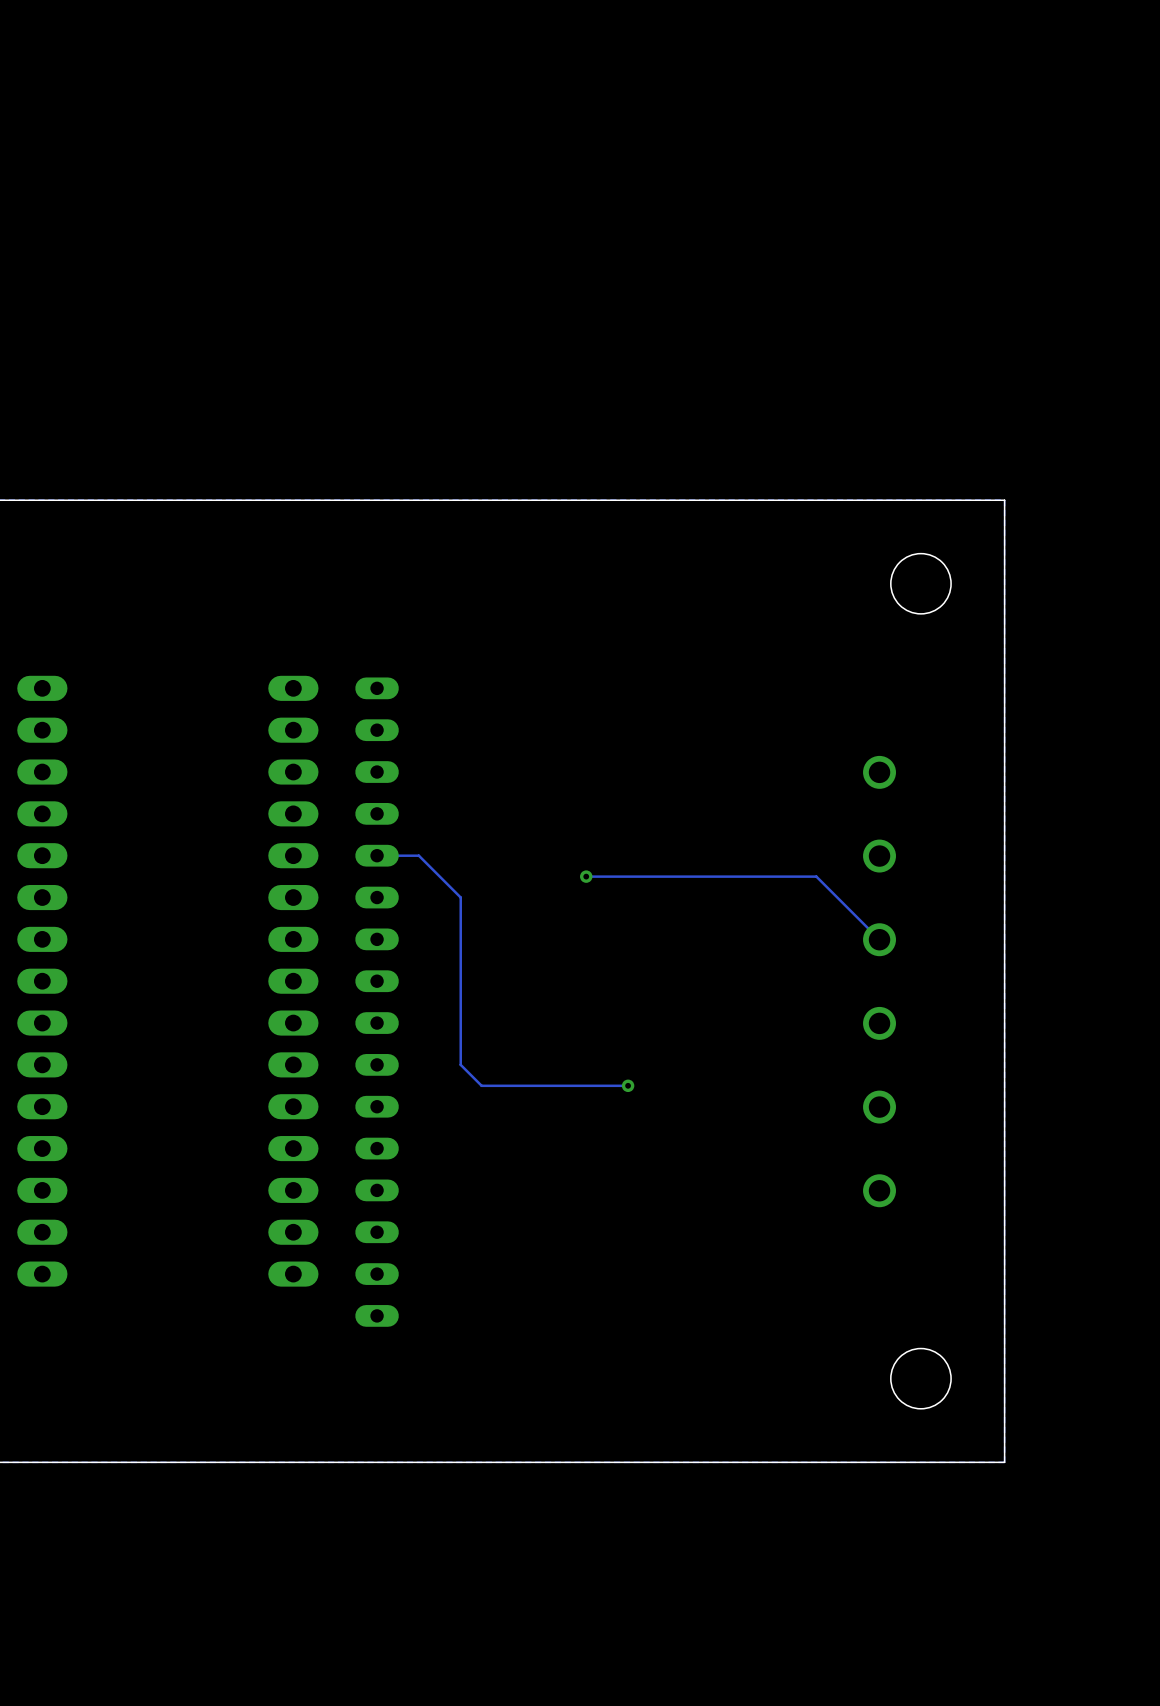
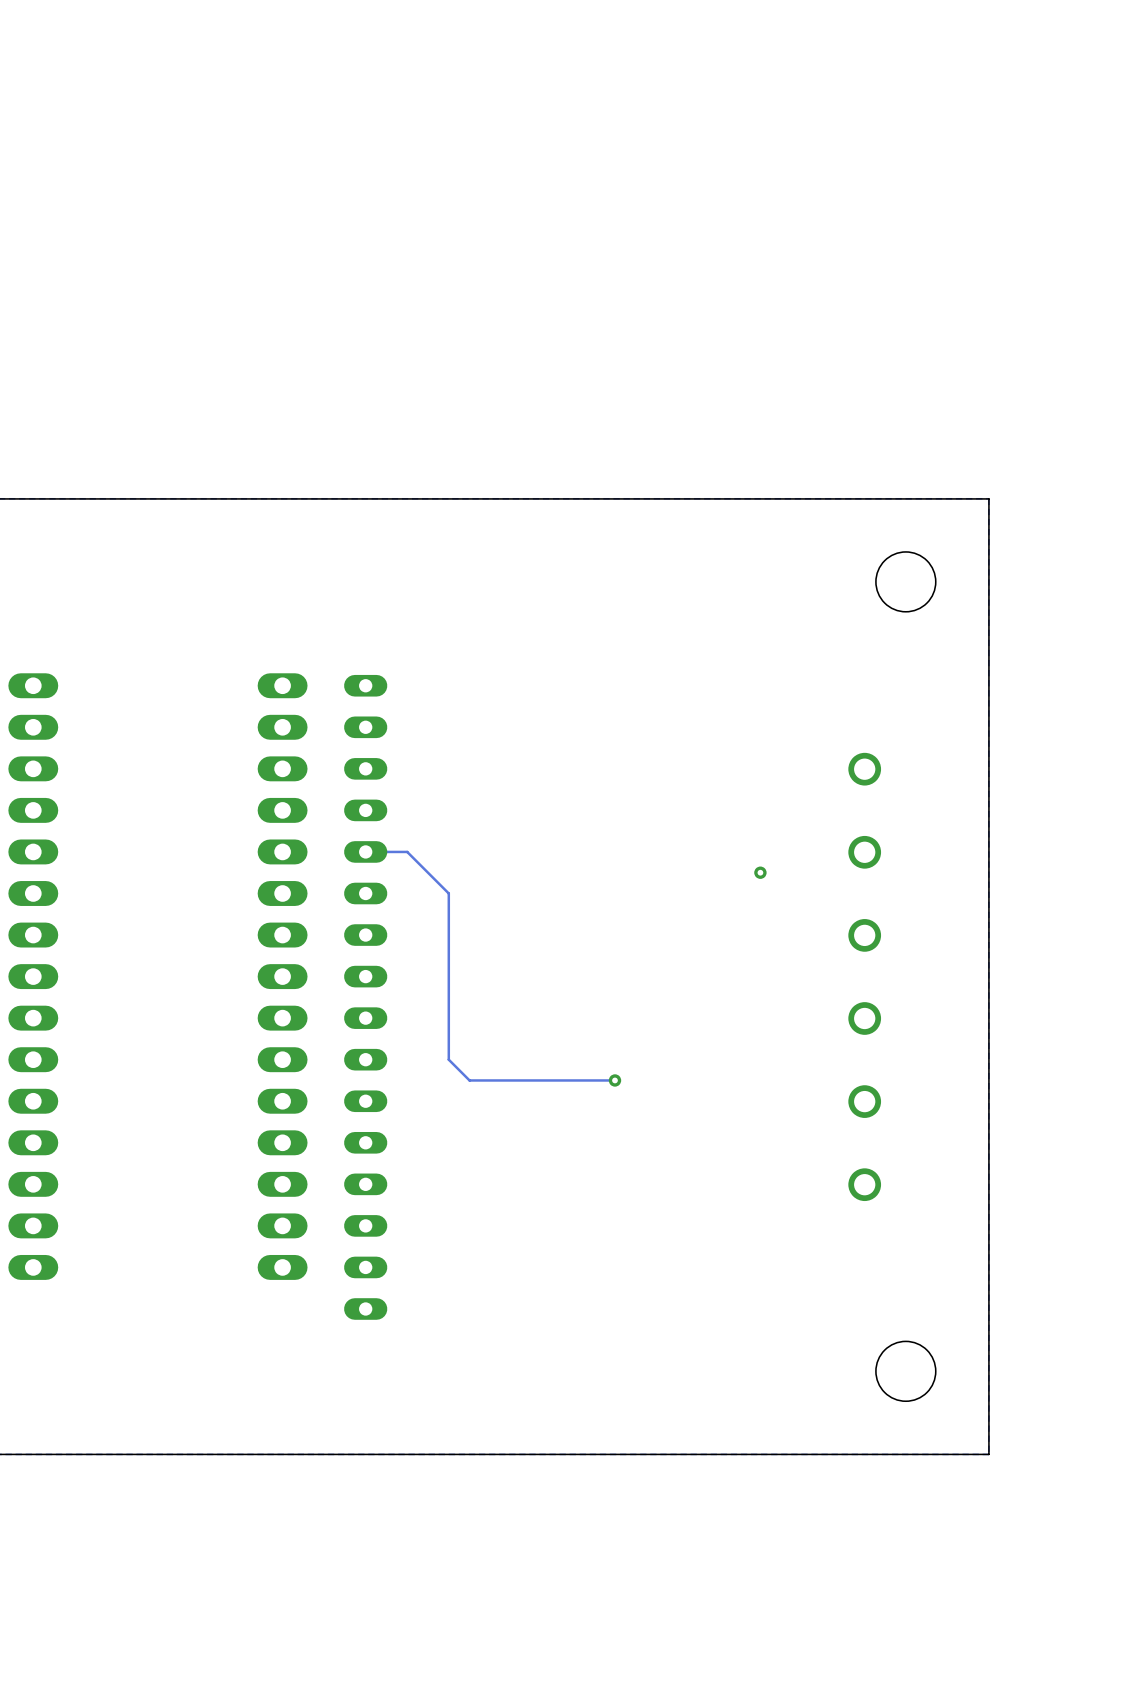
track: (586, 876) (816, 876) (879, 939) -> none
via: (586, 876) -> none
via: none -> (760, 872)

